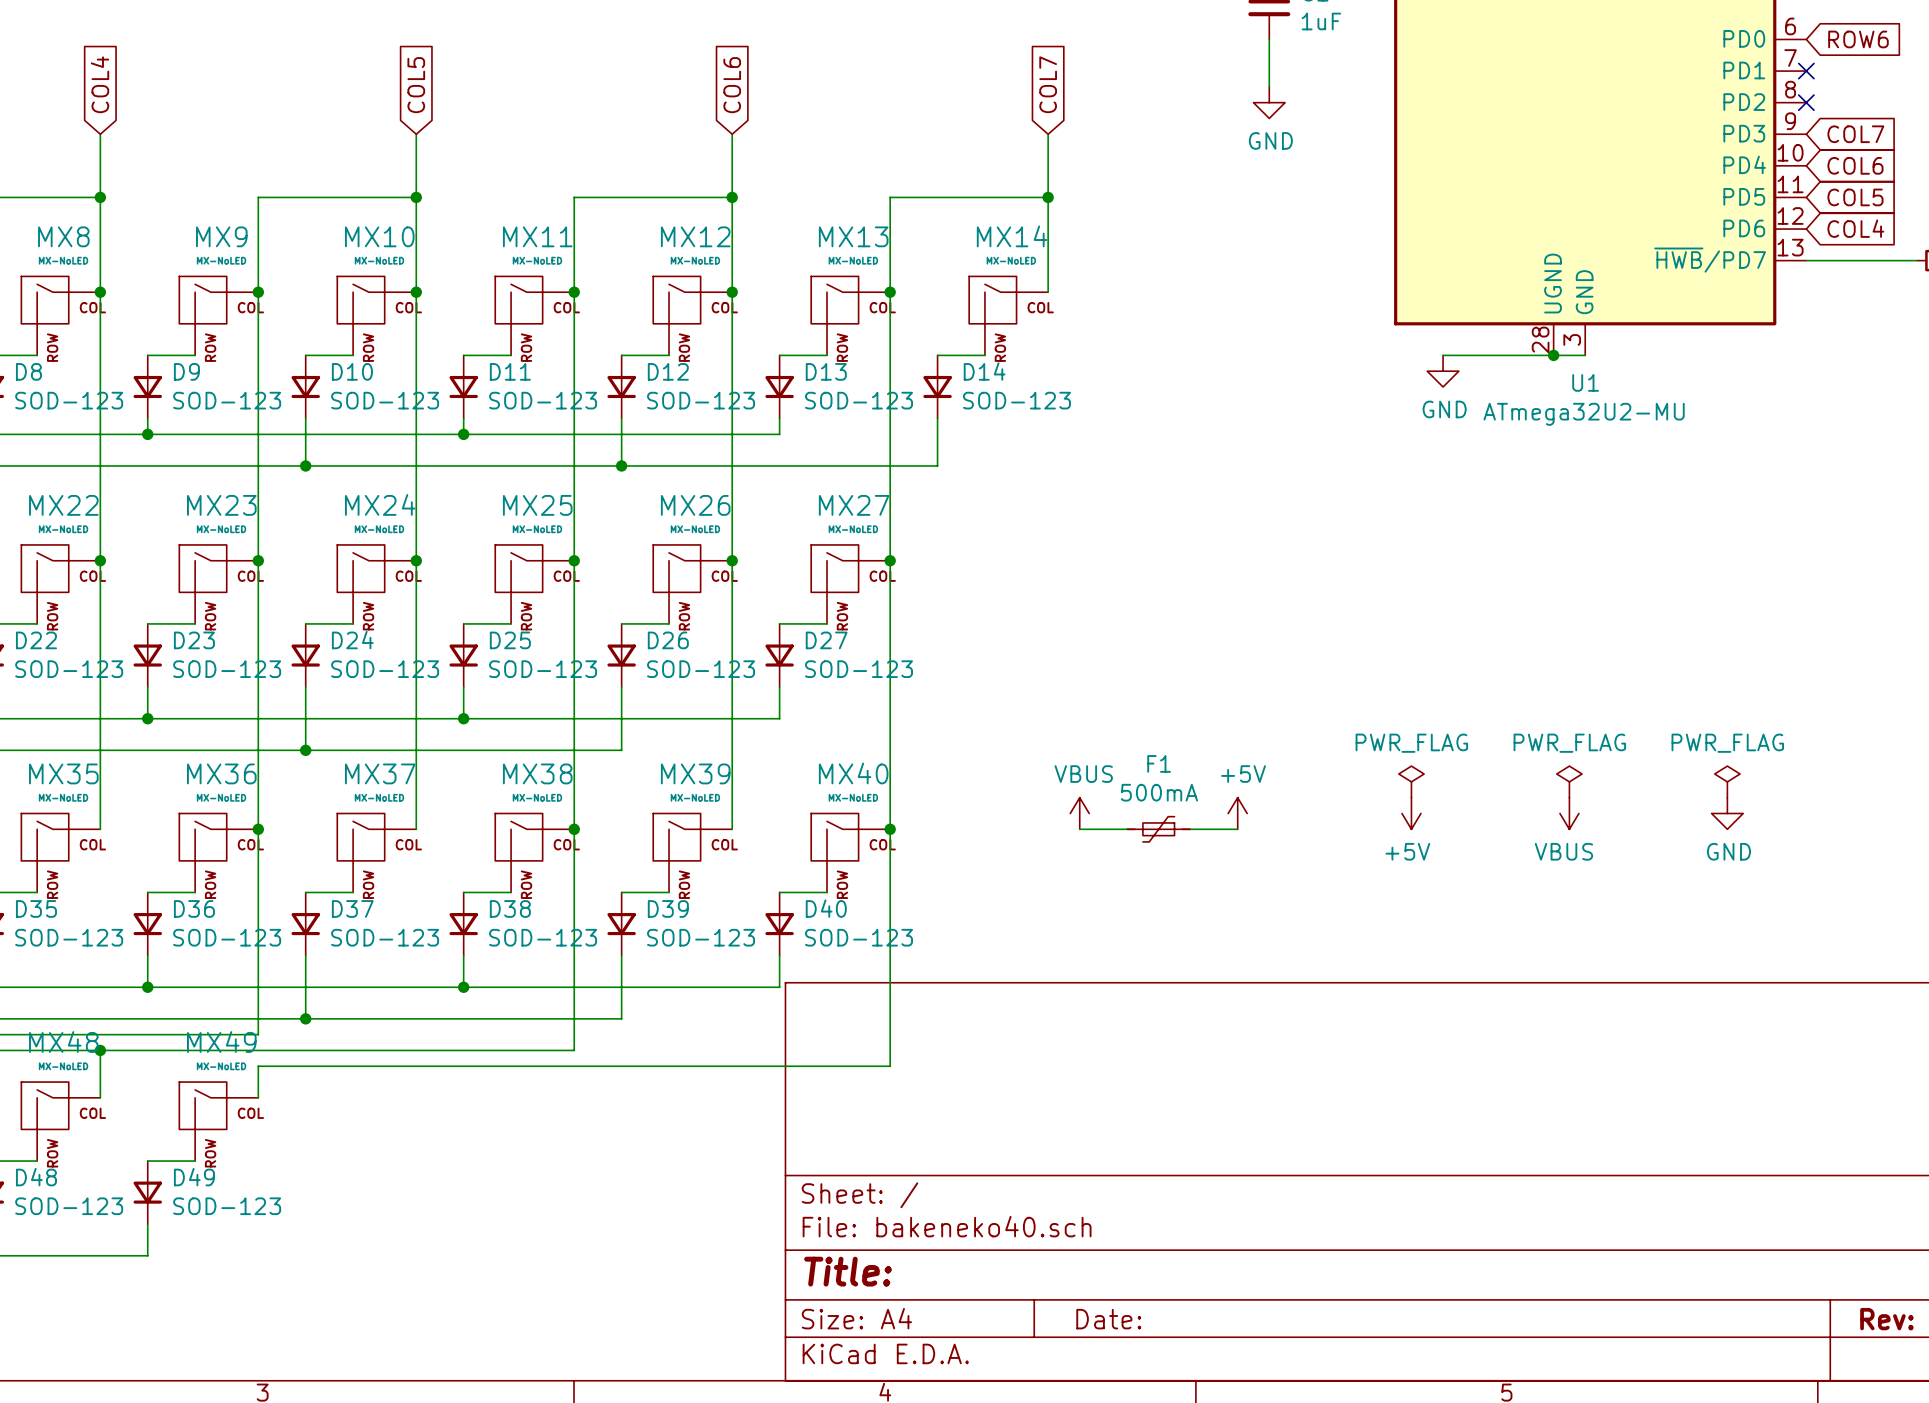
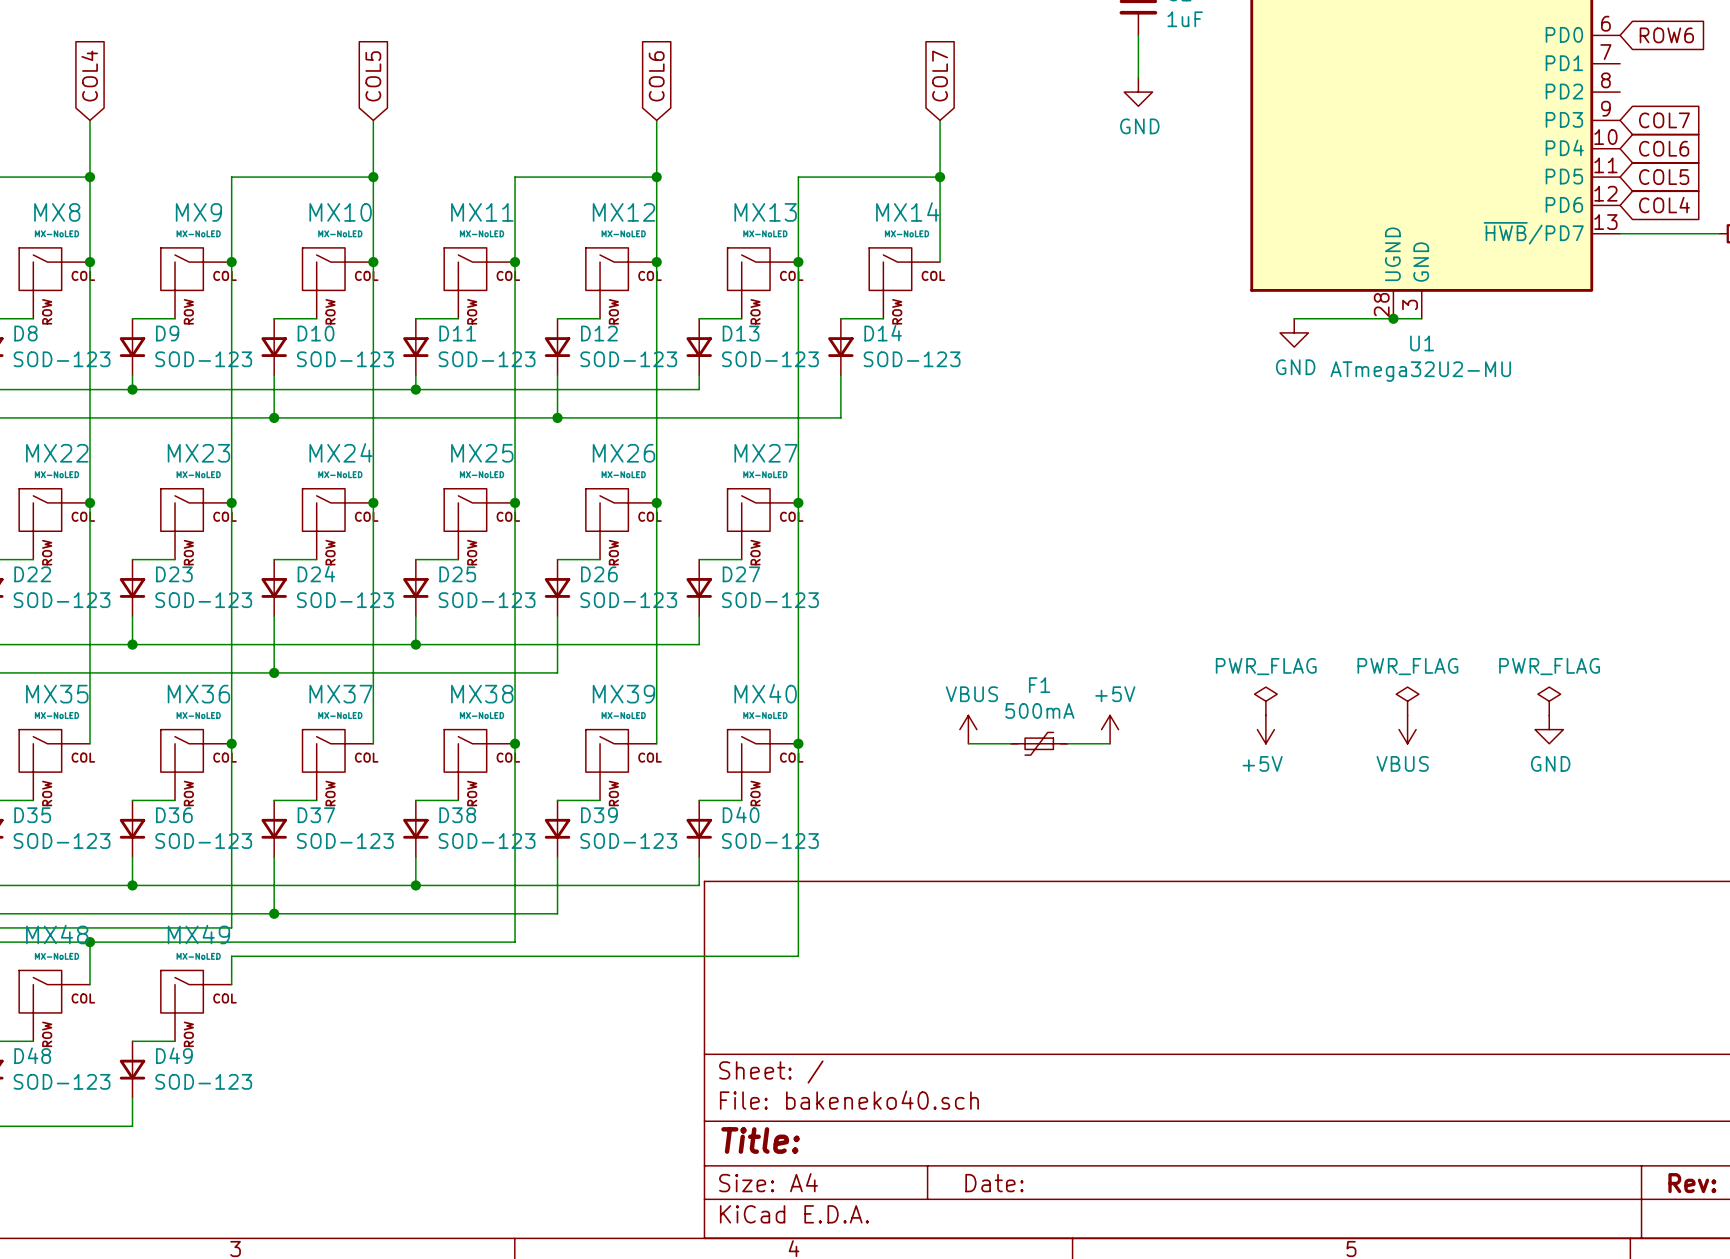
no-connect mark: (1806, 71) -> none
no-connect mark: (1806, 102) -> none

